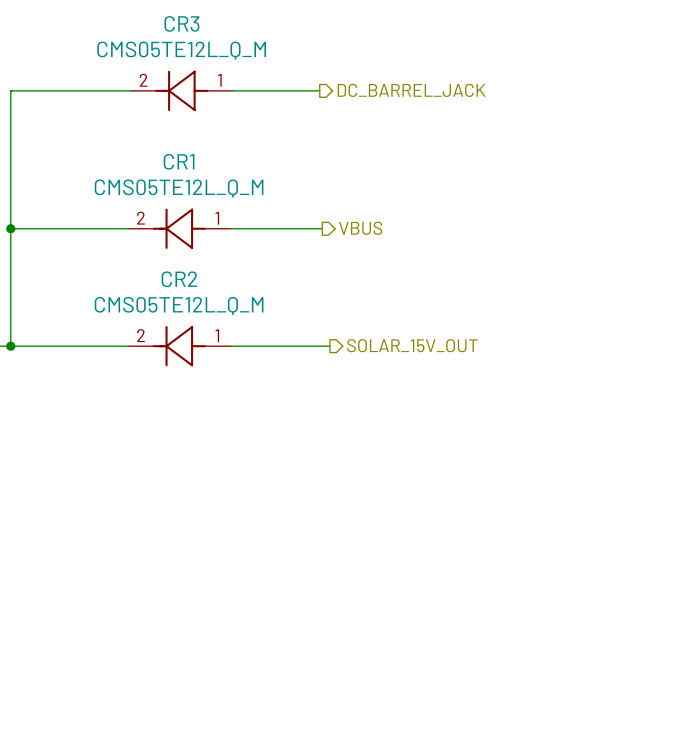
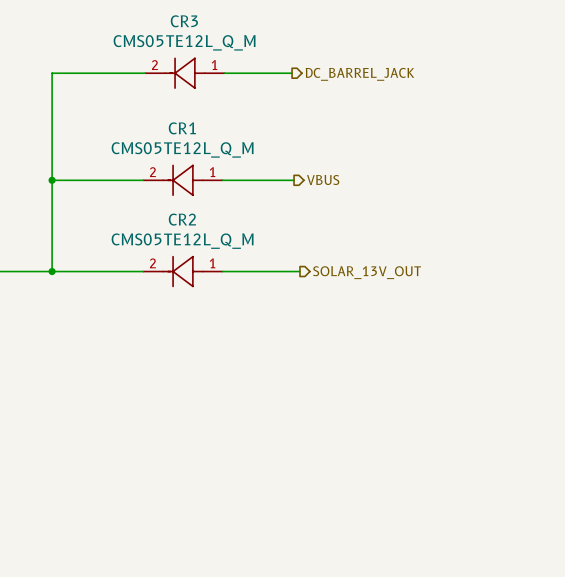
hierarchical label: SOLAR_15V_OUT (412, 345) -> SOLAR_13V_OUT (367, 272)

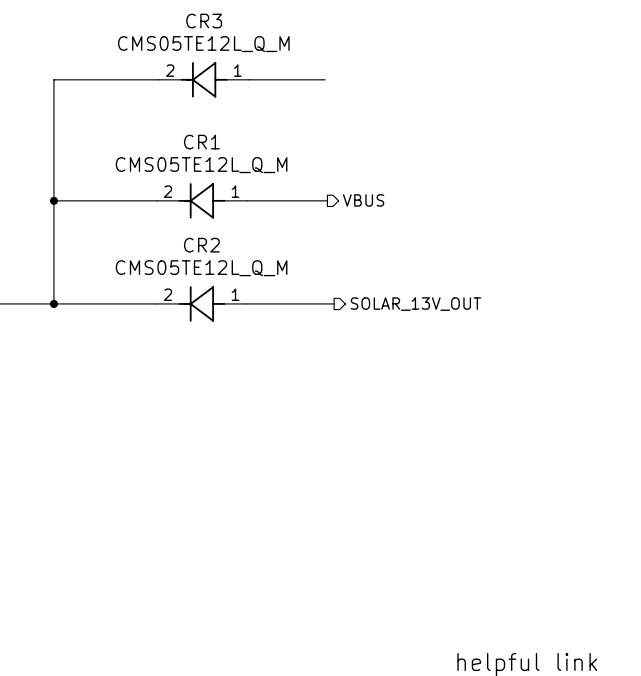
hierarchical label: DC_BARREL_JACK (359, 74) -> none

